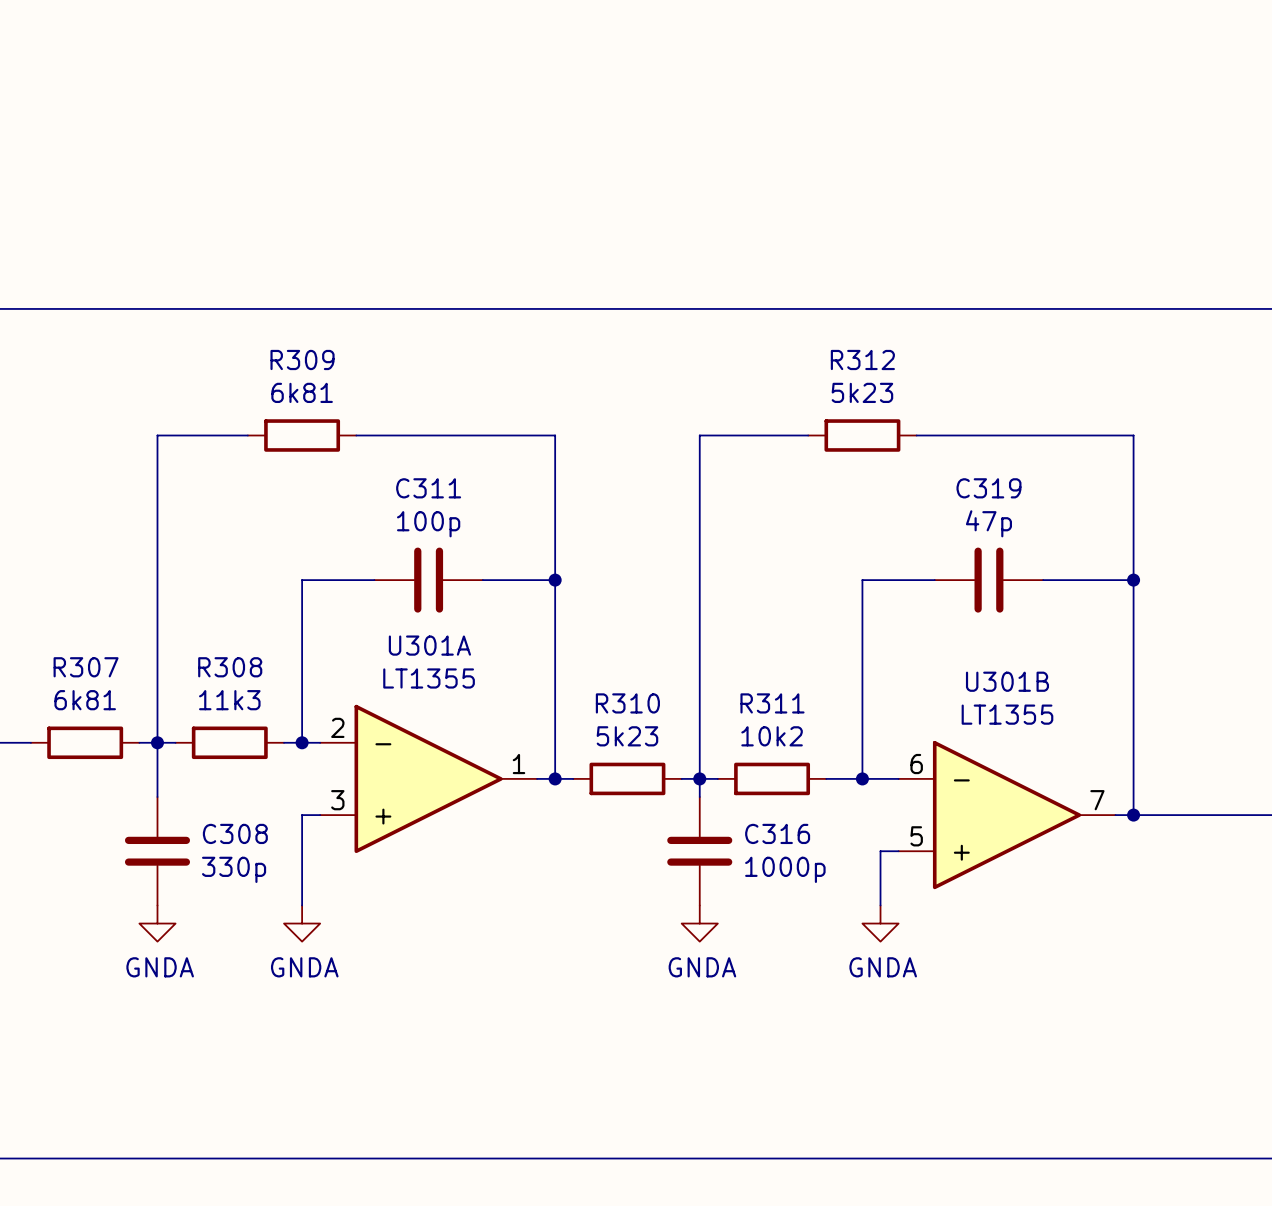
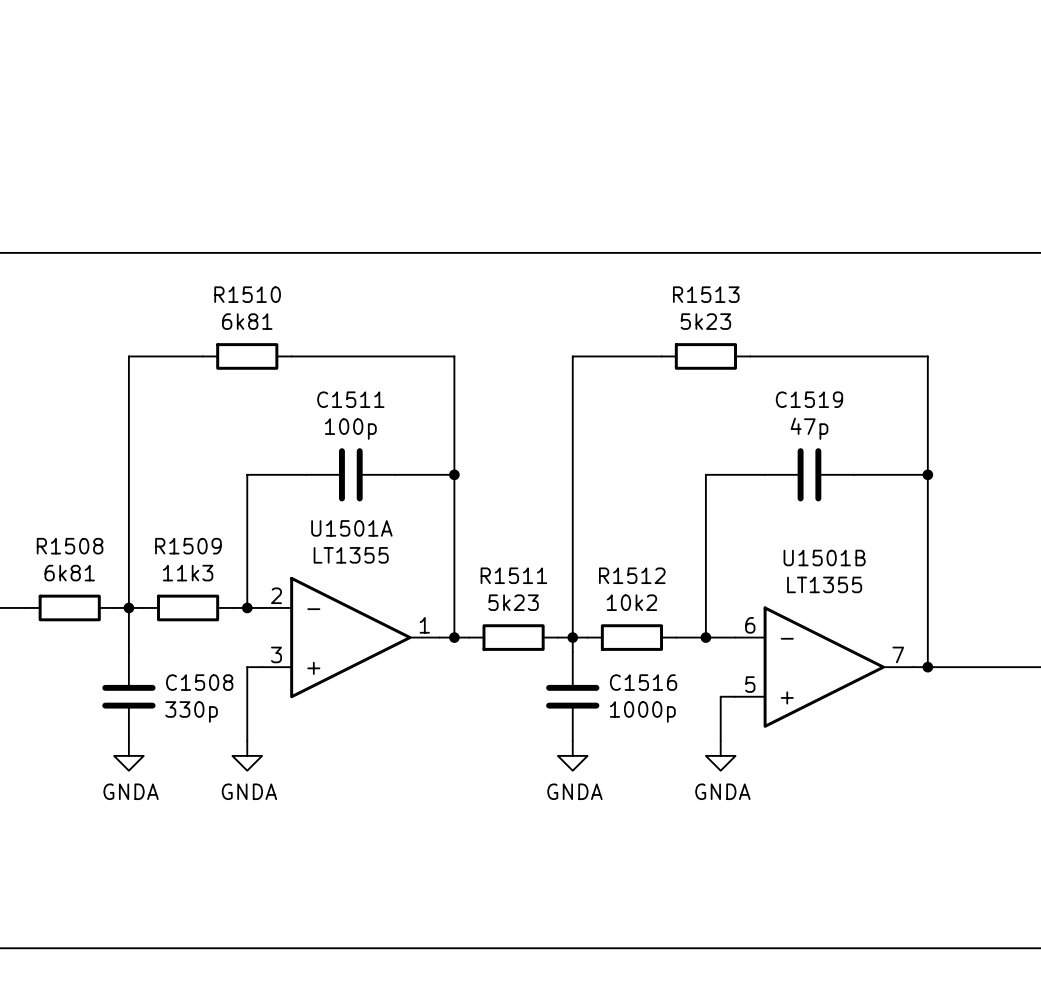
R309 name: R309 (302, 359) -> R1510 (247, 294)
R312 name: R312 (862, 359) -> R1513 (706, 294)
C311 name: C311 (428, 488) -> C1511 (350, 399)
C319 name: C319 (988, 488) -> C1519 (809, 399)
U301A name: U301A (429, 645) -> U1501A (351, 528)
R307 name: R307 (86, 667) -> R1508 (70, 546)
R308 name: R308 (230, 667) -> R1509 (188, 546)
U301B name: U301B (1007, 681) -> U1501B (824, 558)
R310 name: R310 (627, 703) -> R1511 (513, 575)
R311 name: R311 (772, 703) -> R1512 (632, 575)
C308 name: C308 (235, 833) -> C1508 (199, 682)
C316 name: C316 (777, 833) -> C1516 (643, 682)

